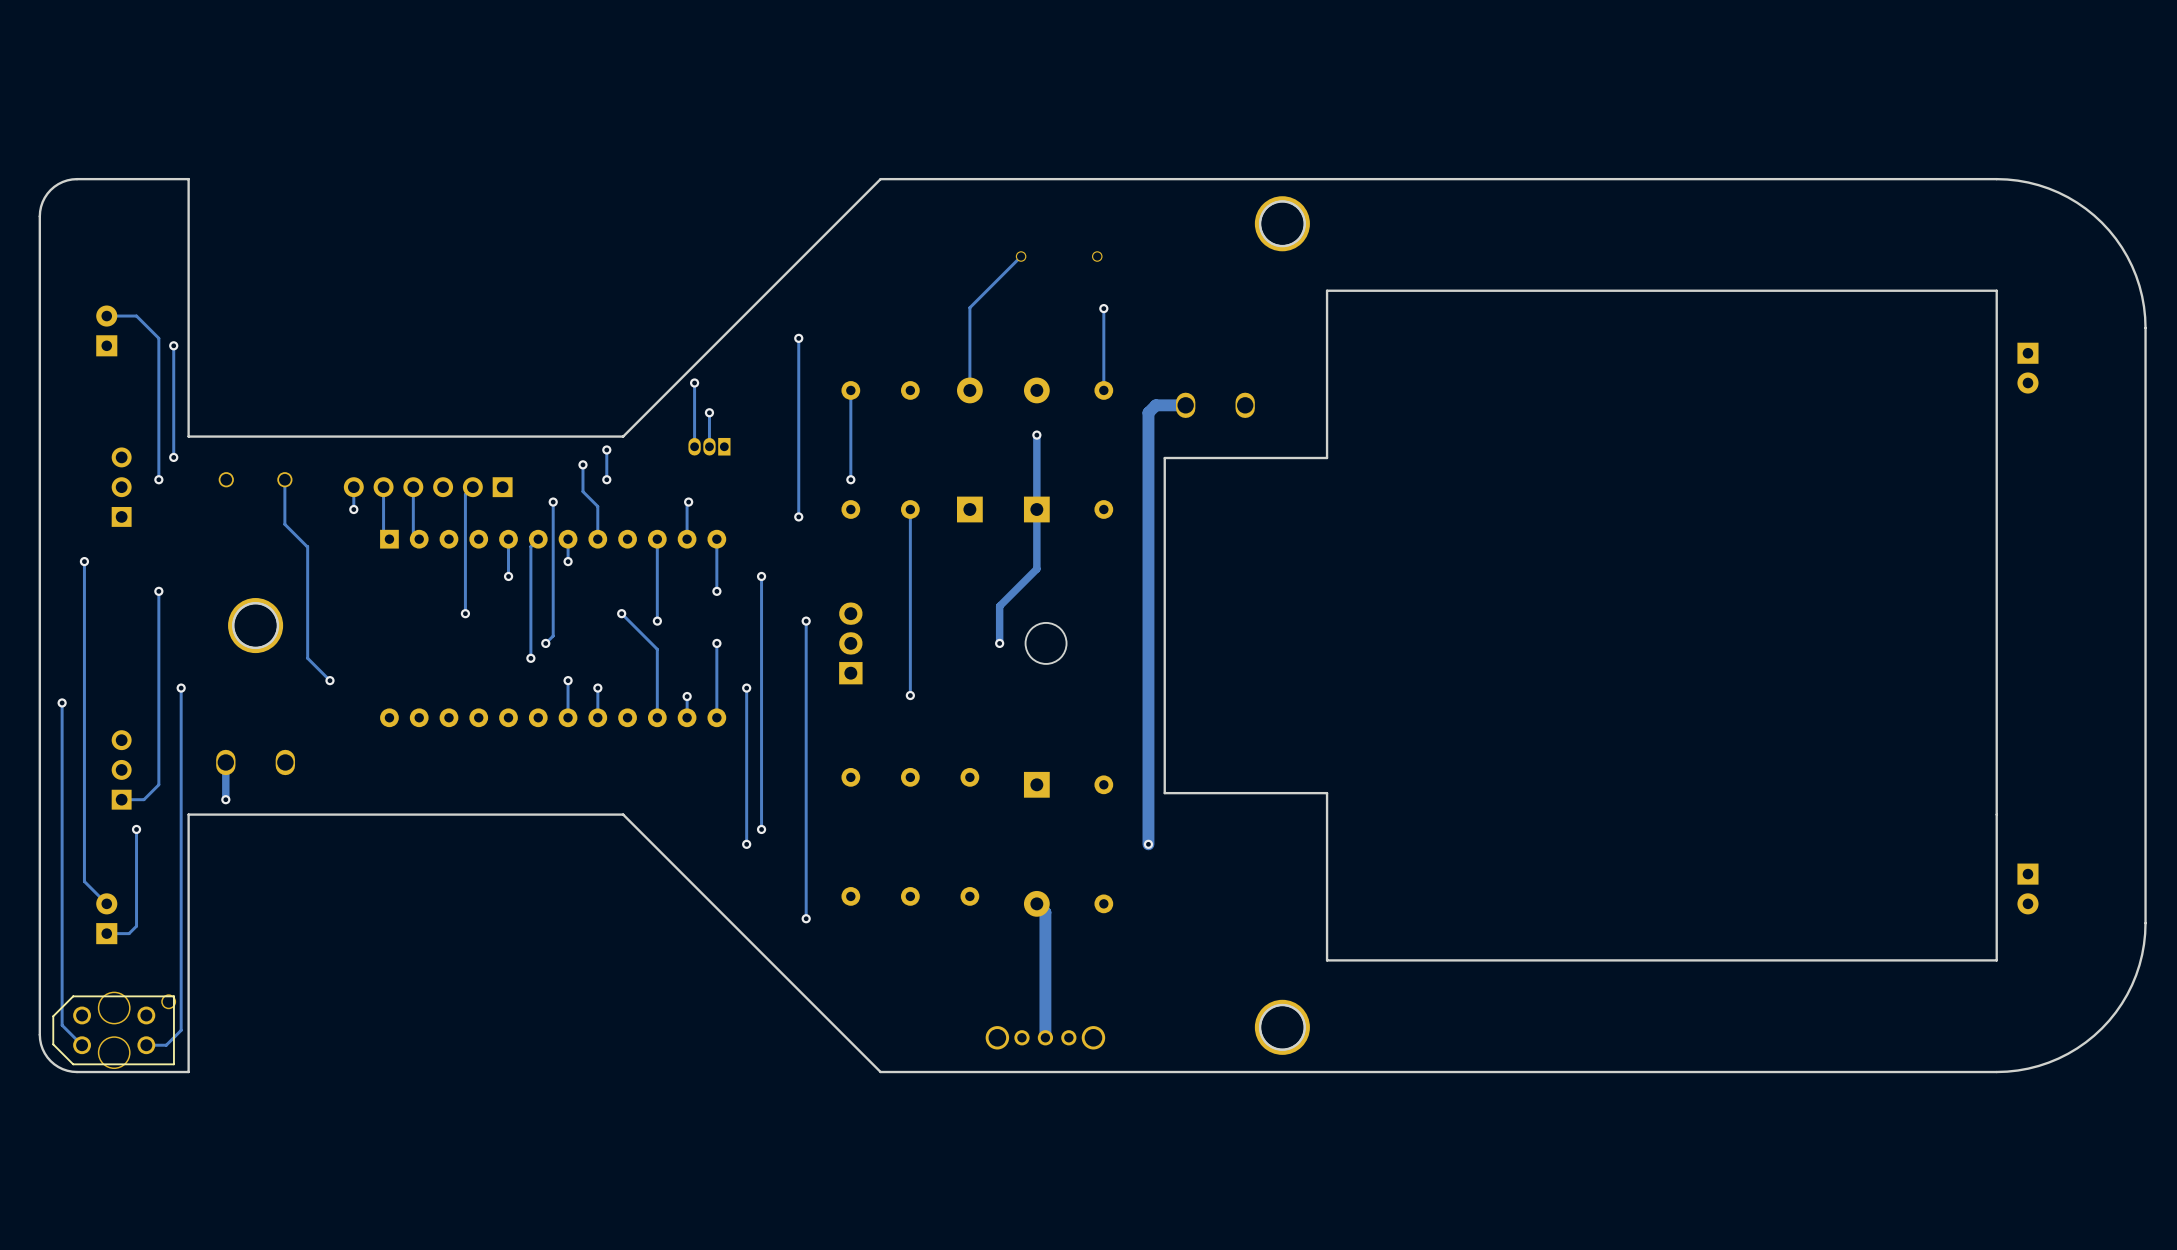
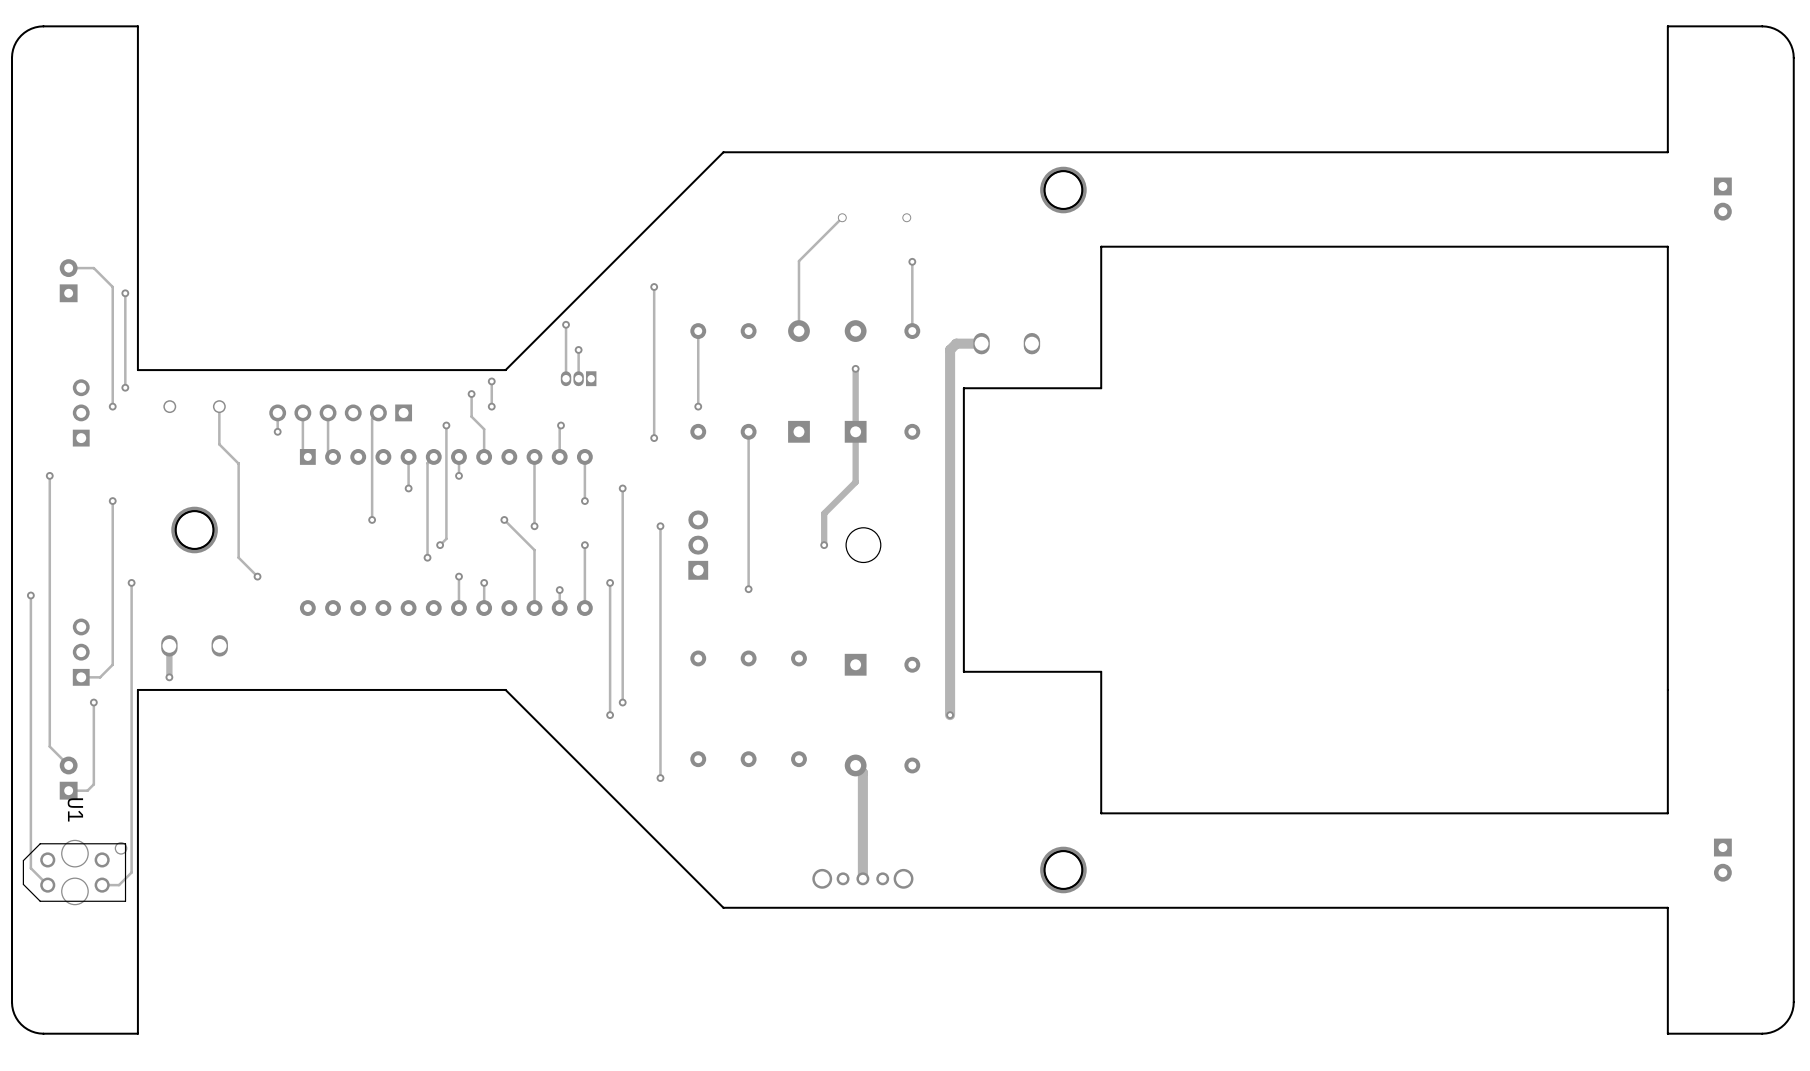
board edge: (188, 179) (67, 180) (58, 184) (47, 193) (42, 202) (39, 216) -> (137, 152) (137, 26) (35, 27) (21, 35) (14, 45) (12, 53) (12, 183)
board edge: (1996, 179) (2028, 182) (2058, 192) (2085, 208) (2101, 222) (2121, 247) (2136, 275) (2144, 306) (2145, 327) -> (1667, 152) (1667, 26) (1766, 26) (1774, 28) (1784, 35) (1791, 45) (1793, 57) (1793, 278)
part position: (2027, 368) -> (1722, 199)
part position: (2027, 888) -> (1722, 860)
board edge: (2145, 923) (2144, 944) (2136, 975) (2121, 1003) (2101, 1028) (2077, 1048) (2048, 1062) (2028, 1068) (1996, 1072) -> (1793, 781) (1793, 1002) (1791, 1014) (1784, 1024) (1778, 1029) (1766, 1033) (1667, 1033) (1667, 907)
U1 name: none -> U1 (75, 809)
board edge: (39, 1034) (42, 1049) (47, 1057) (58, 1067) (67, 1070) (188, 1072) -> (12, 876) (12, 1006) (18, 1021) (24, 1027) (35, 1032) (137, 1033) (137, 907)

